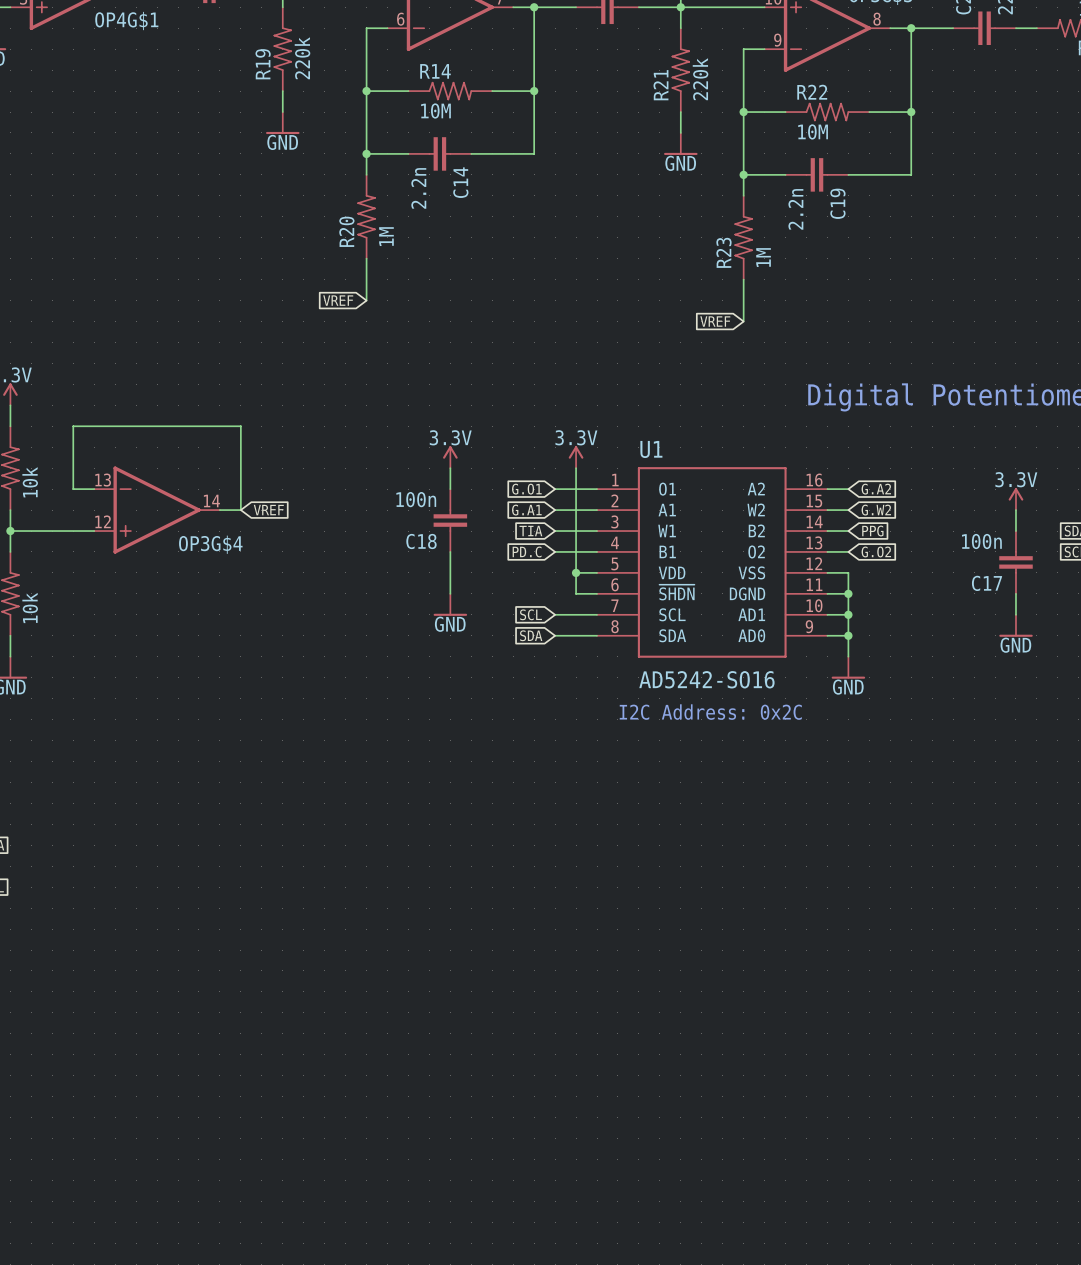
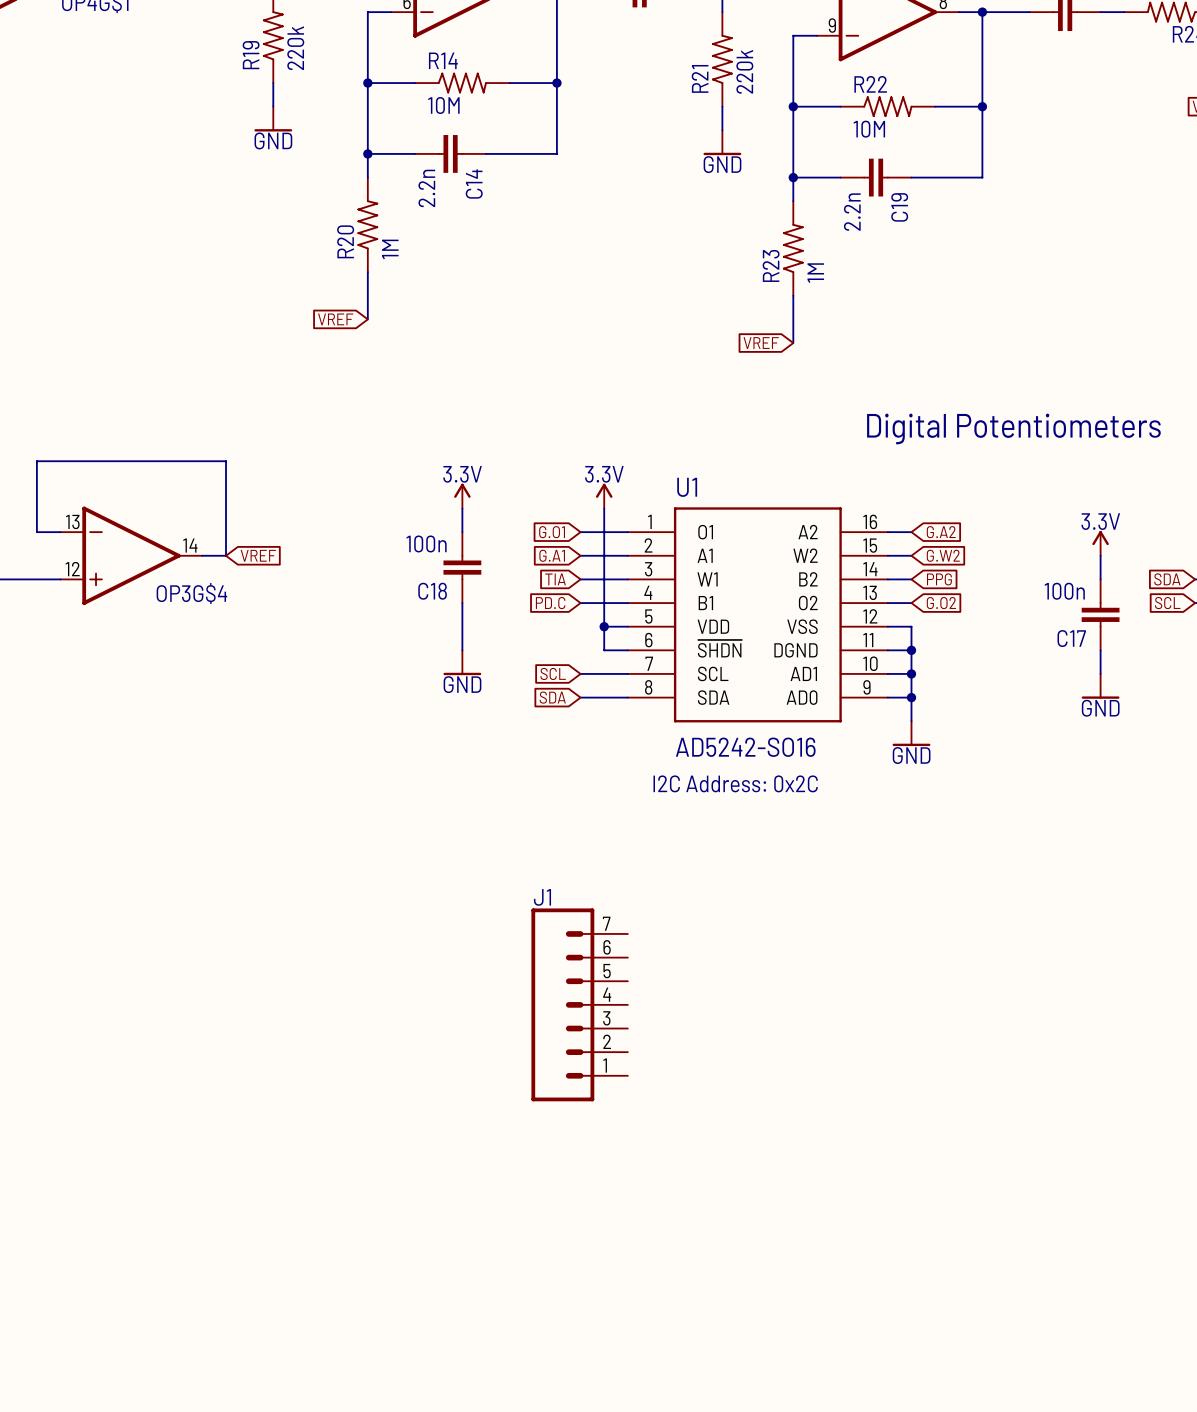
J1: none -> (579, 1004)

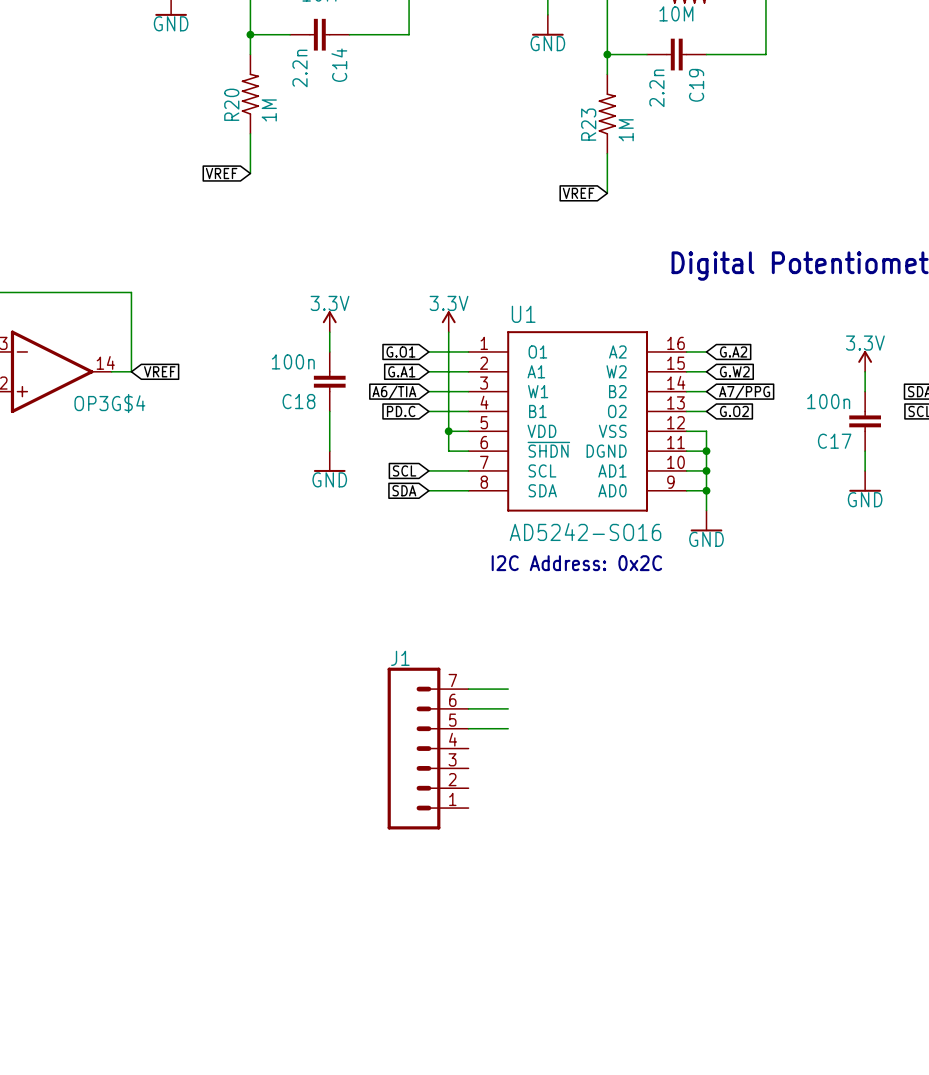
global label: TIA (555, 579) -> A6/TIA (394, 392)
global label: PPG (939, 579) -> A7/PPG (744, 392)
wire: none -> (468, 689) (508, 689)
wire: none -> (468, 708) (508, 708)
wire: none -> (468, 728) (508, 728)

